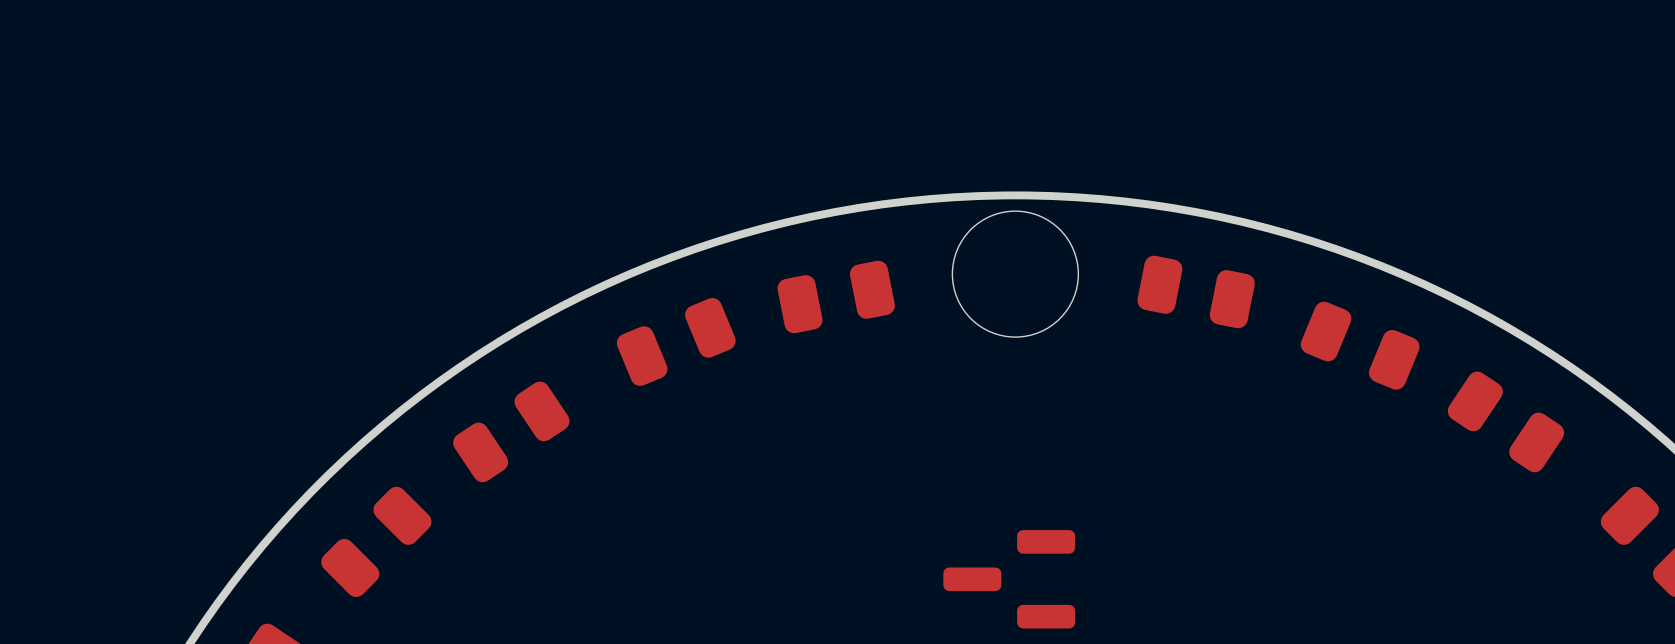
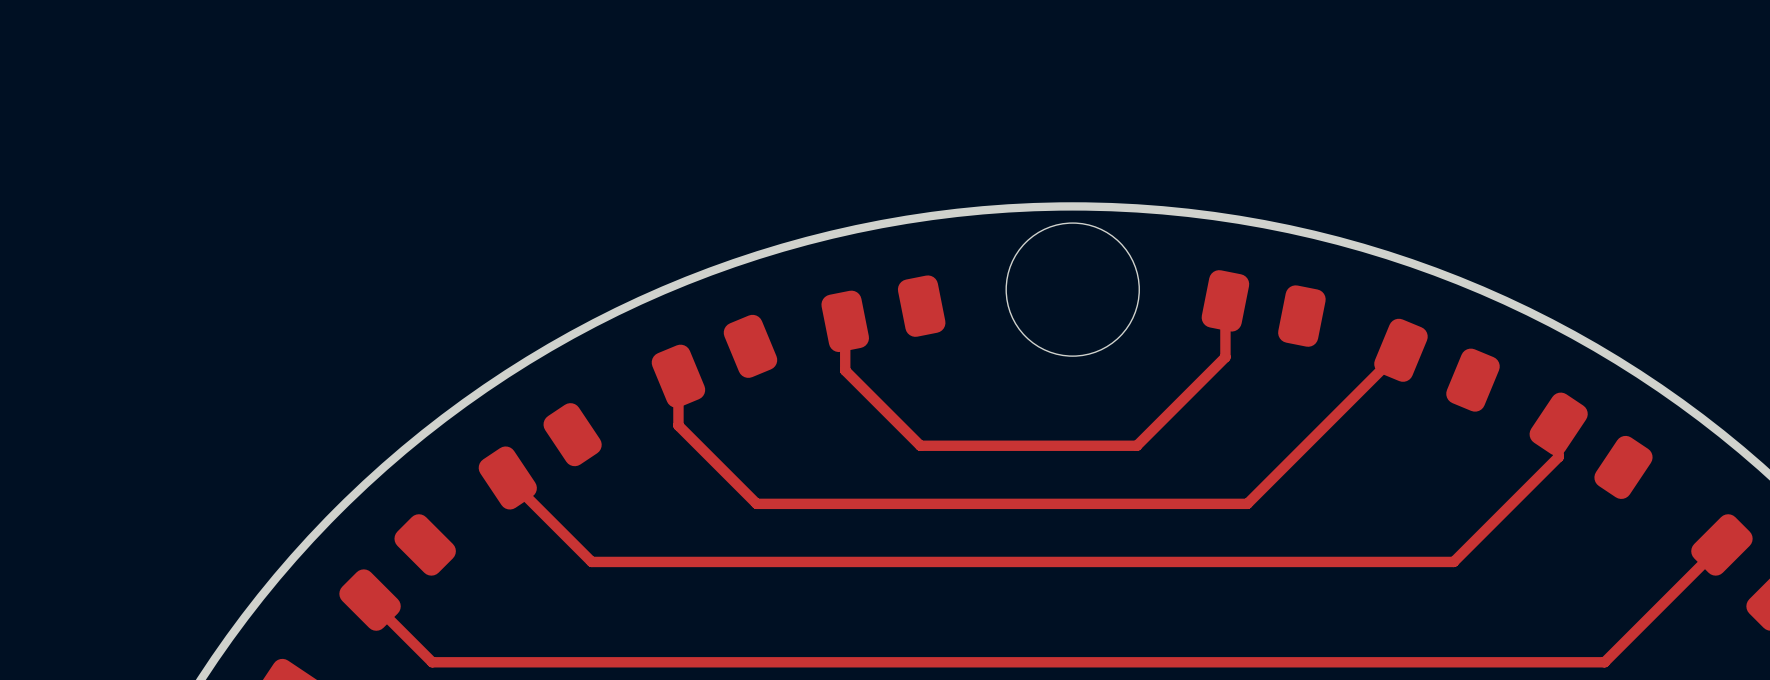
top track: none -> (1225, 300) (1225, 357) (1136, 445) (920, 445) (845, 370) (845, 321)
top track: none -> (1400, 350) (1247, 503) (756, 503) (678, 425) (678, 376)
top track: none -> (1558, 424) (1558, 457) (1453, 561) (591, 561) (507, 477)
top track: none -> (1721, 544) (1604, 662) (432, 662) (370, 600)
part: (1009, 579) -> none

